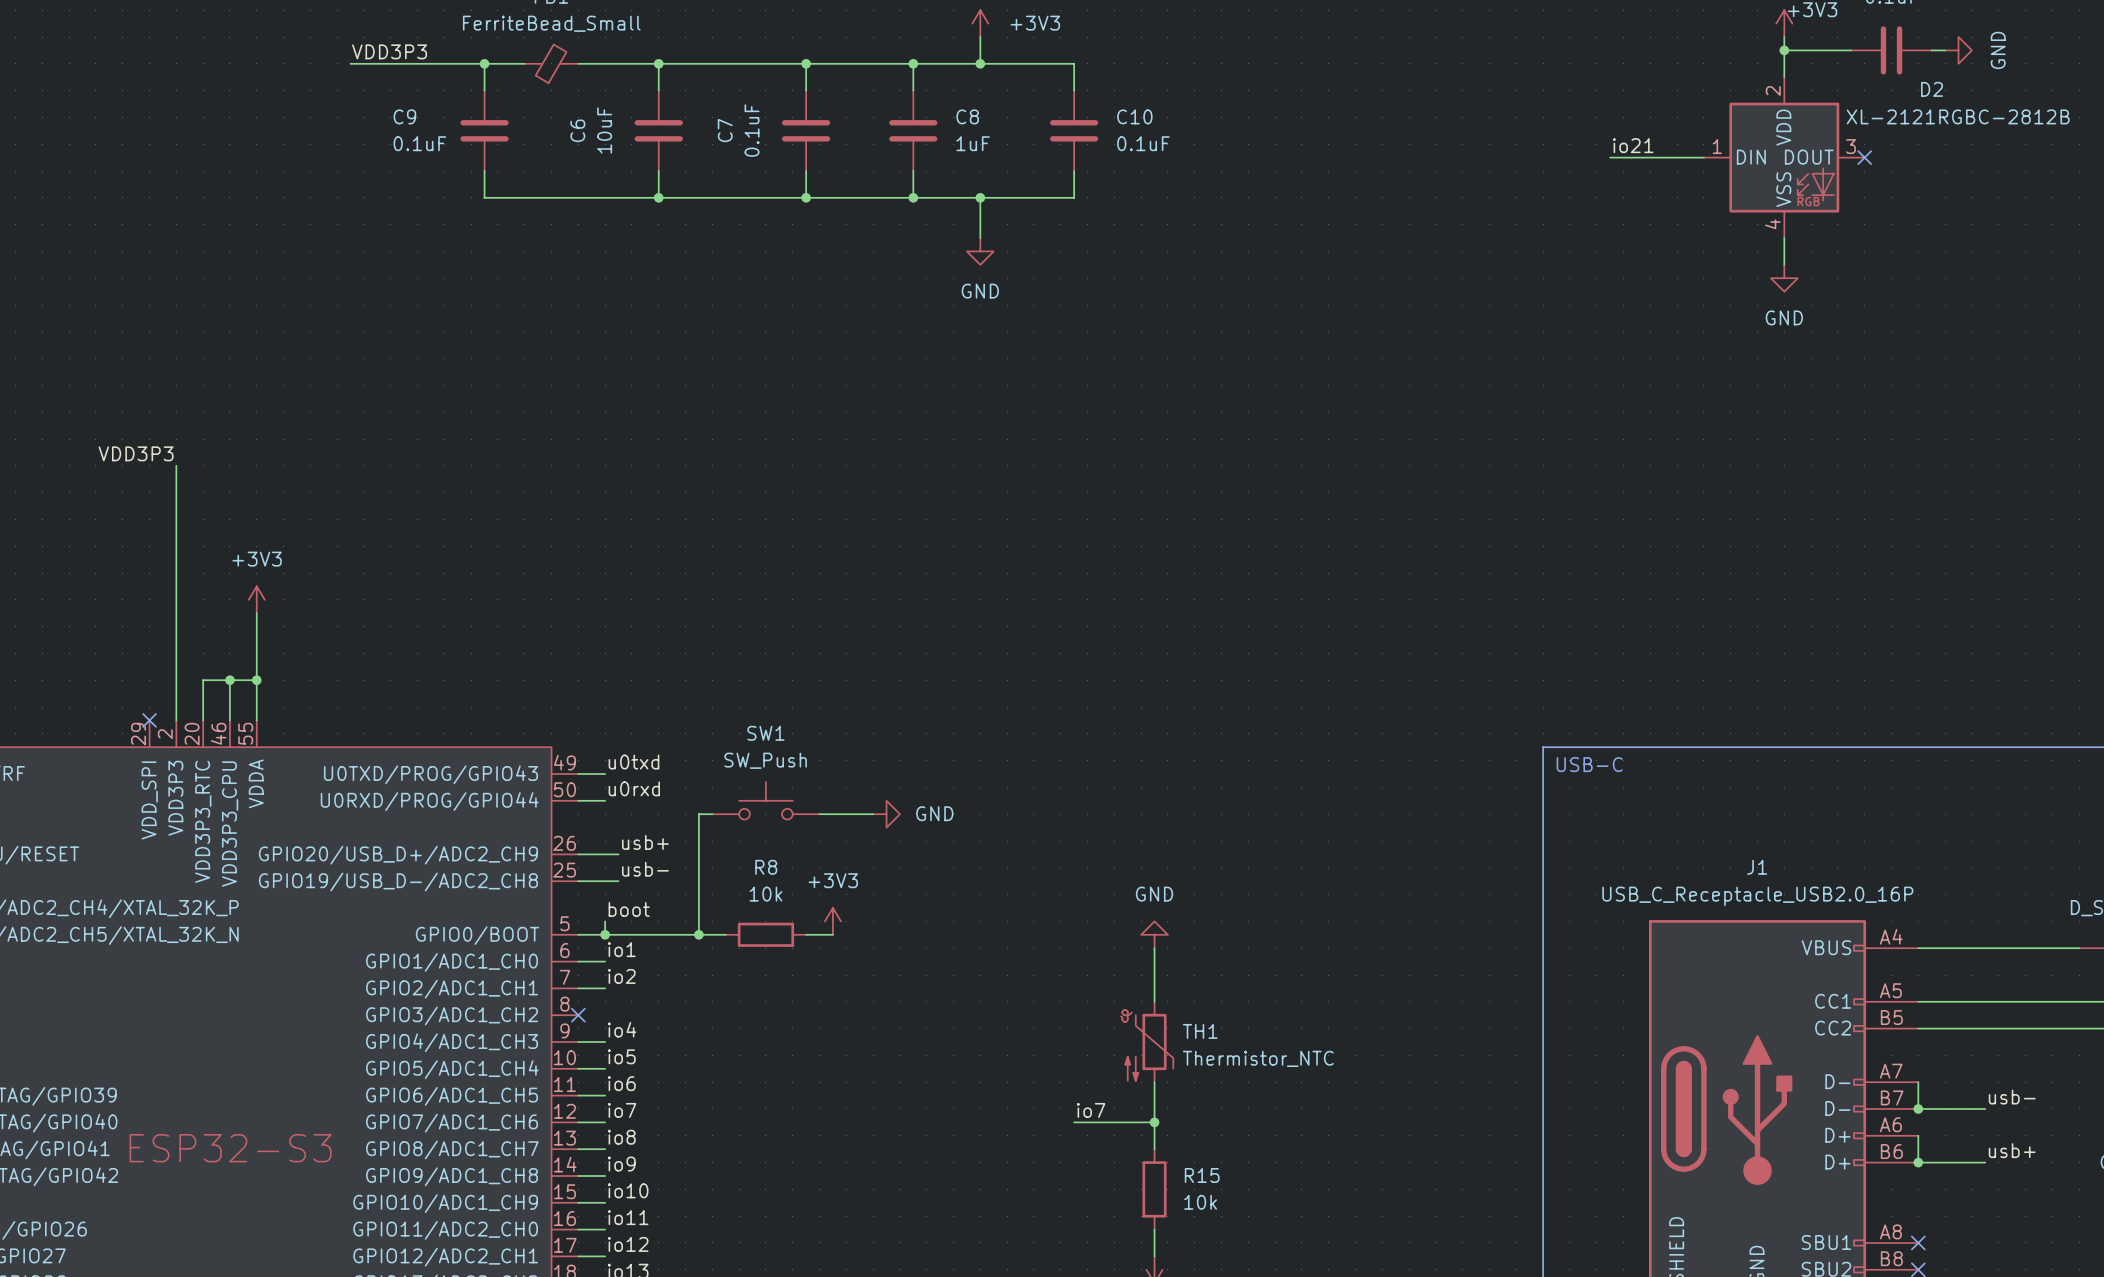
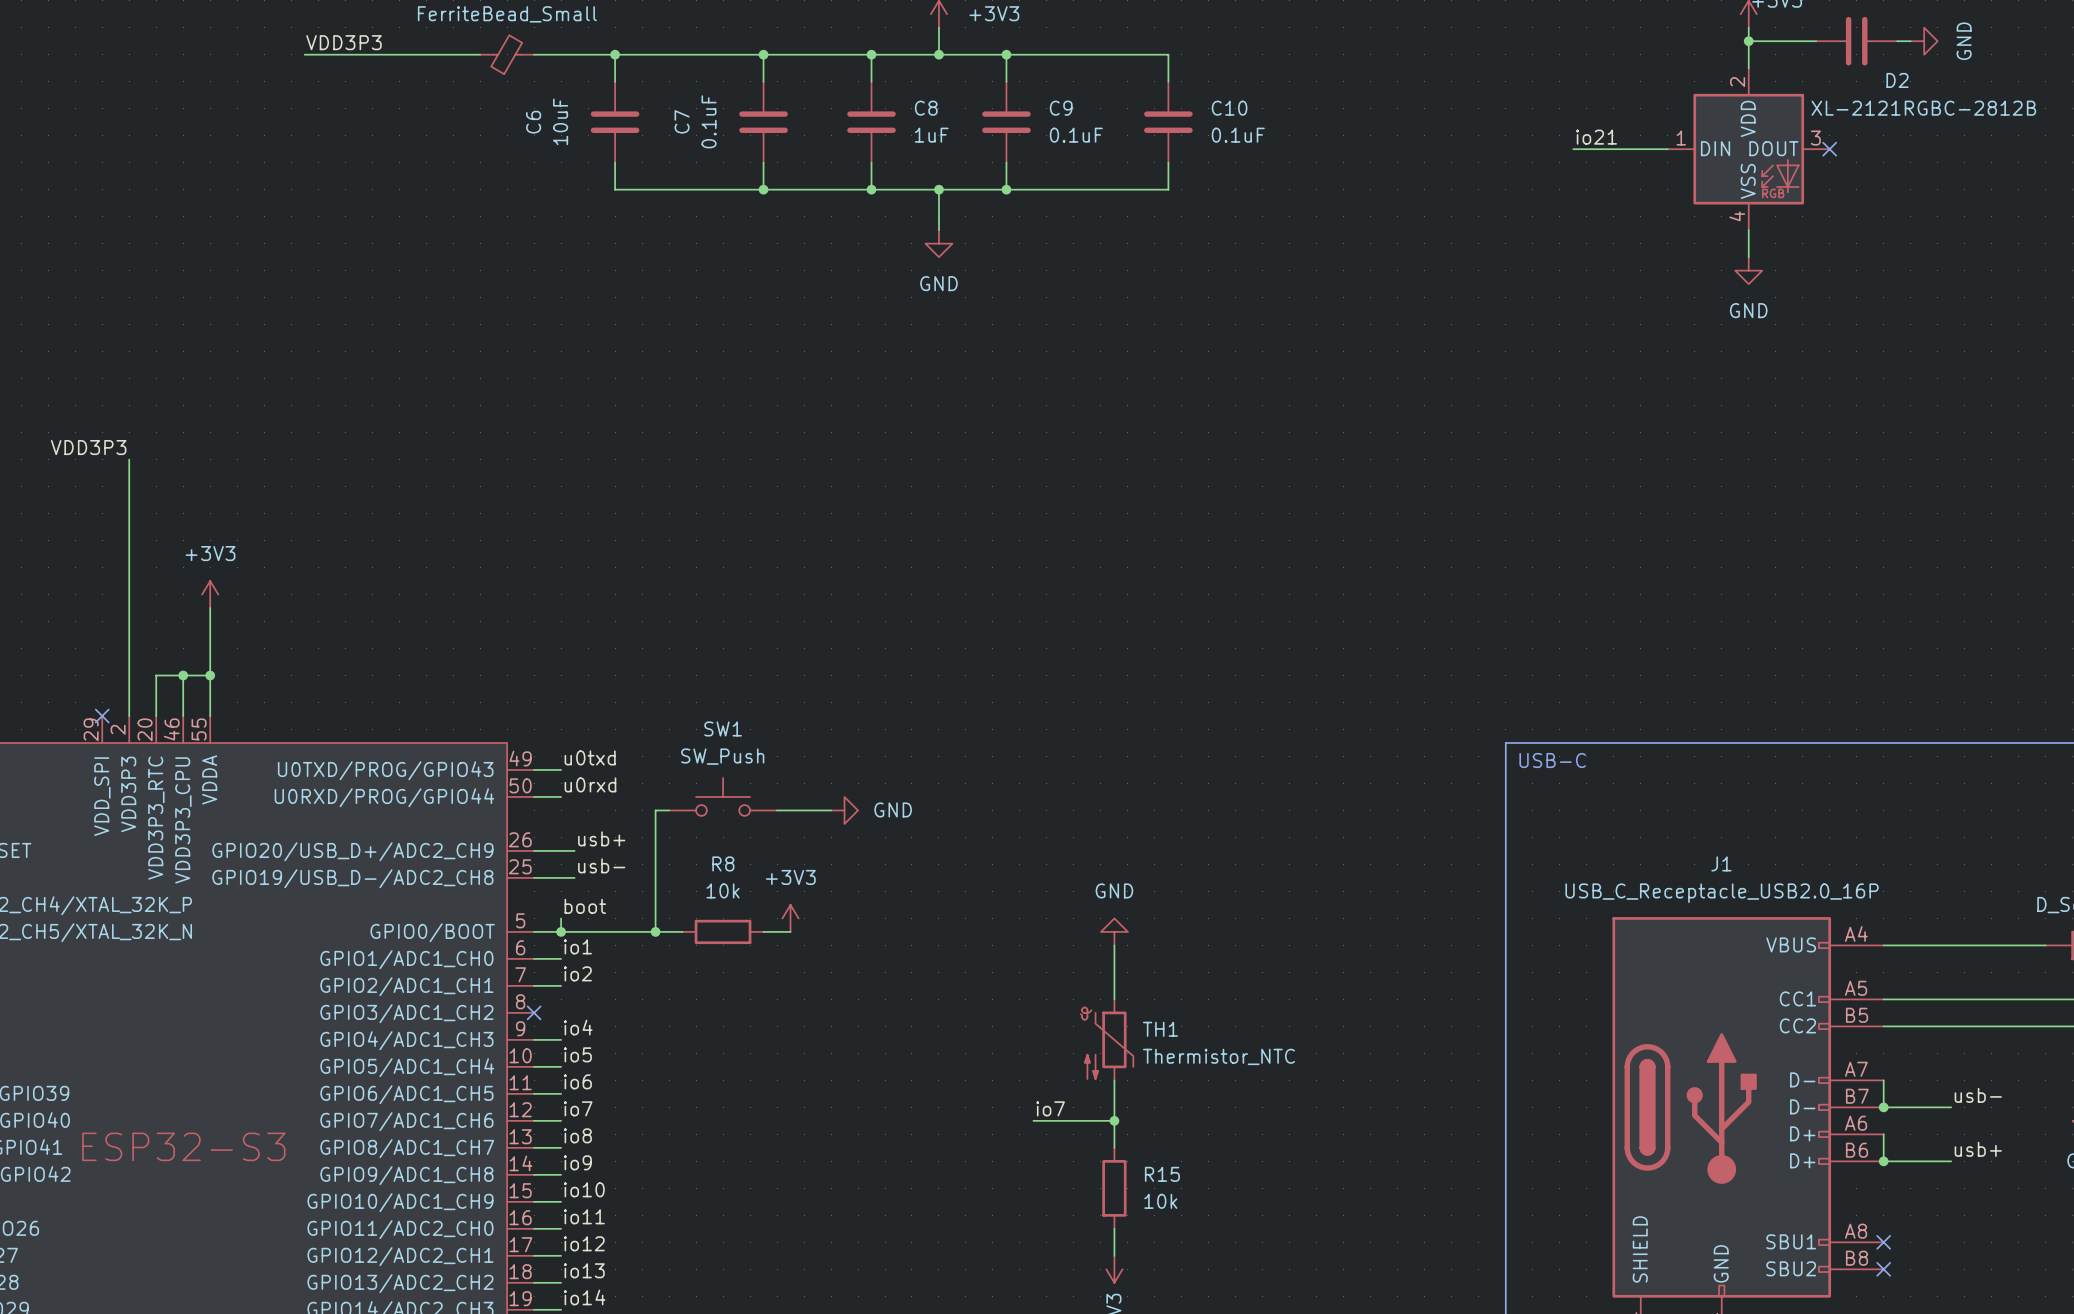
wire: (484, 63) (484, 90) -> none
junction: (484, 63) -> none
wire: none -> (1006, 54) (1006, 81)
junction: none -> (1006, 54)
wire: (1074, 63) (1074, 90) -> (1033, 54) (1168, 54) (1168, 81)
C9 name position: C9 (404, 116) -> C9 (1061, 108)
C9 position: (484, 130) -> (1006, 122)
C10 position: (1074, 130) -> (1168, 122)
C9 value position: 0.1uF (419, 143) -> 0.1uF (1076, 135)
wire: (484, 171) (484, 197) (658, 197) -> none
wire: none -> (1006, 162) (1006, 189)
wire: (1074, 171) (1074, 197) -> (1168, 162) (1168, 189) (1033, 189)
junction: (658, 197) -> none
junction: none -> (1006, 189)

